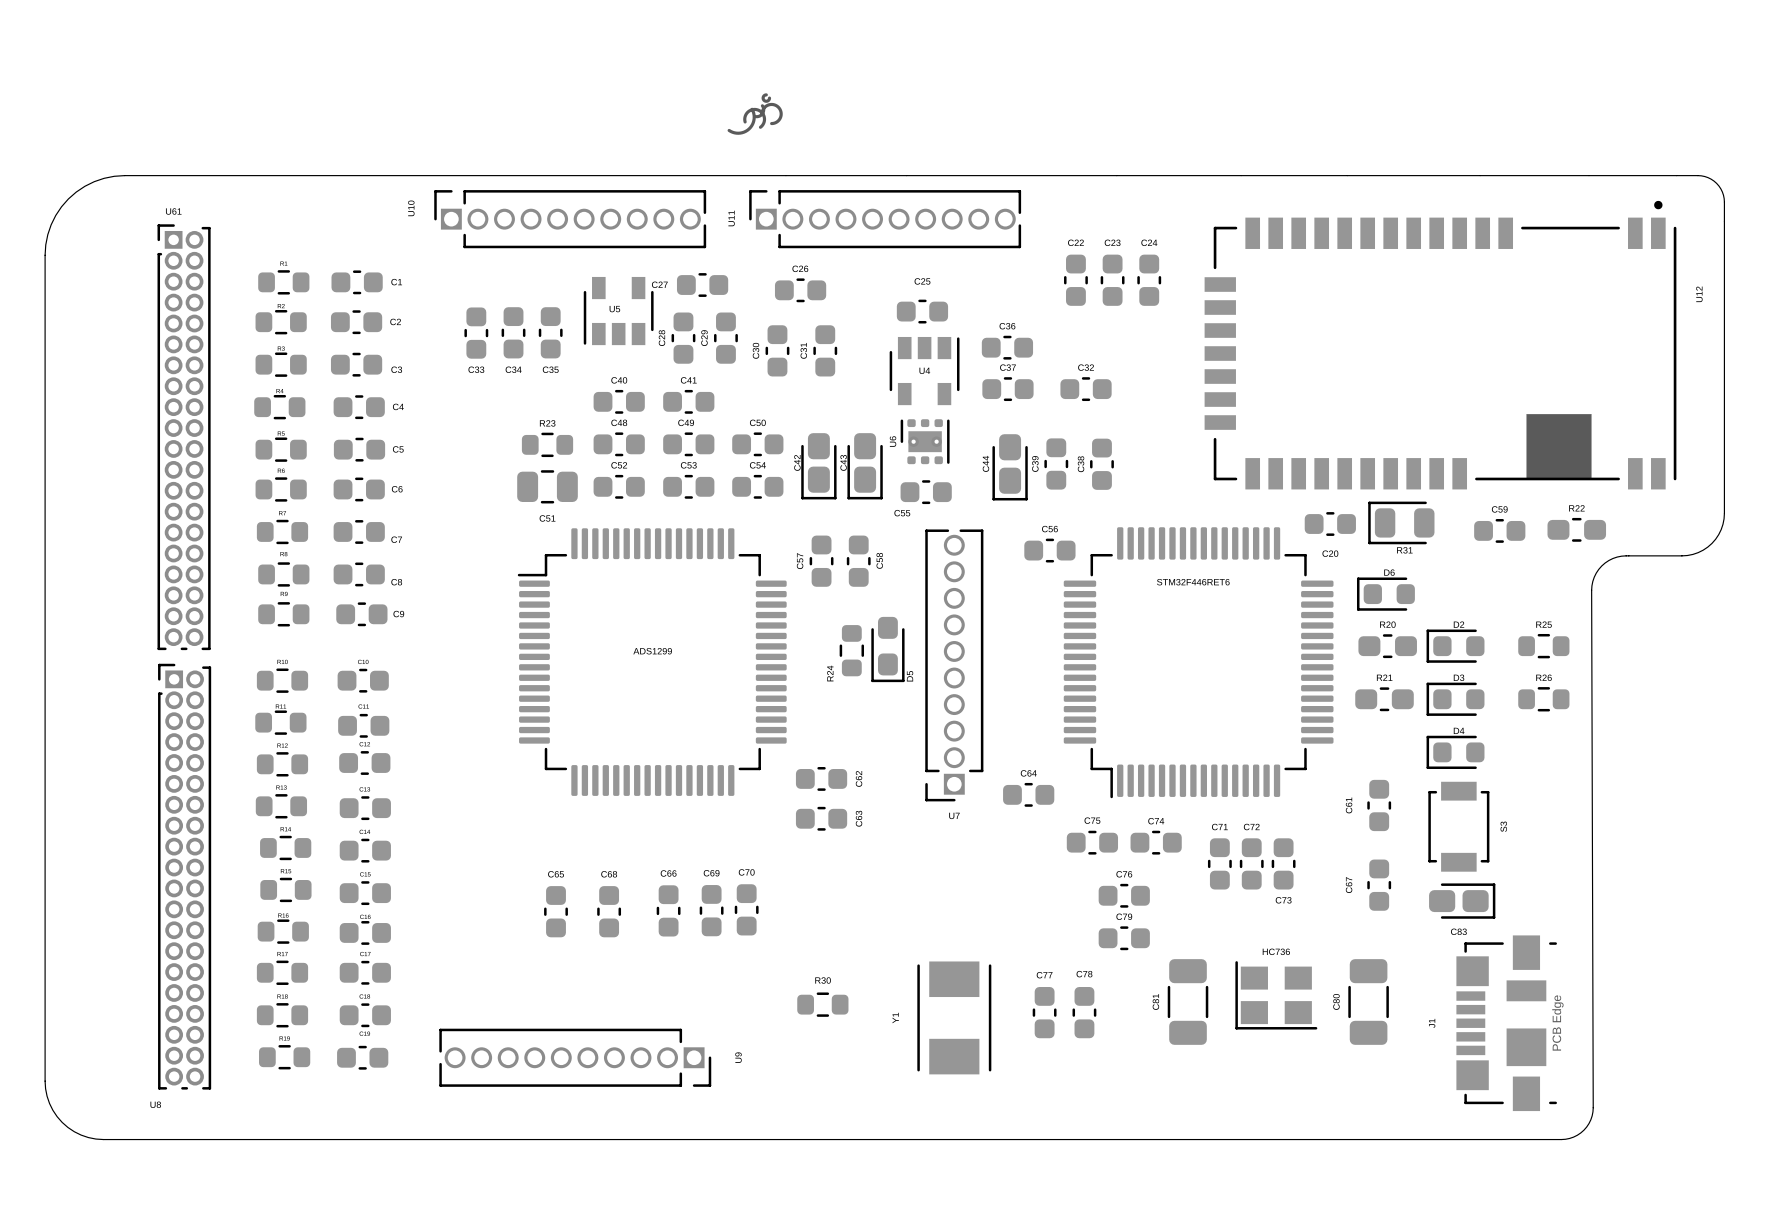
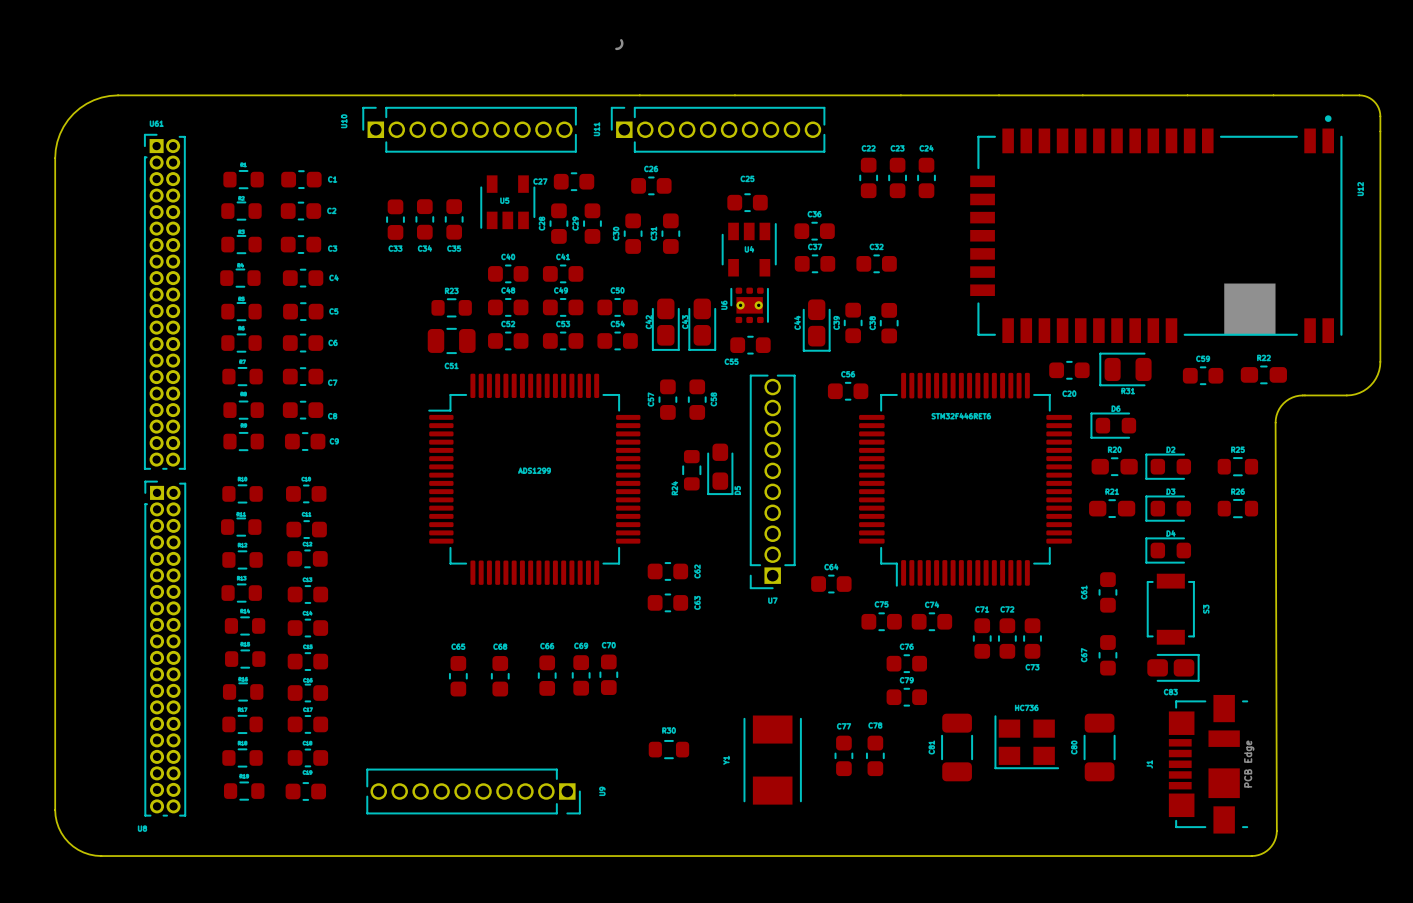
line: (766, 94) (763, 96) (764, 100) (767, 101) (769, 98) -> none
line: (752, 109) (753, 120) (749, 129) (738, 133) (729, 130) -> none
line: (762, 114) (764, 108) (767, 105) (774, 104) (778, 107) (781, 112) (780, 117) (776, 122) (771, 123) -> none
line: (745, 121) (747, 112) (751, 109) (757, 109) (764, 117) (763, 123) (760, 127) -> none

